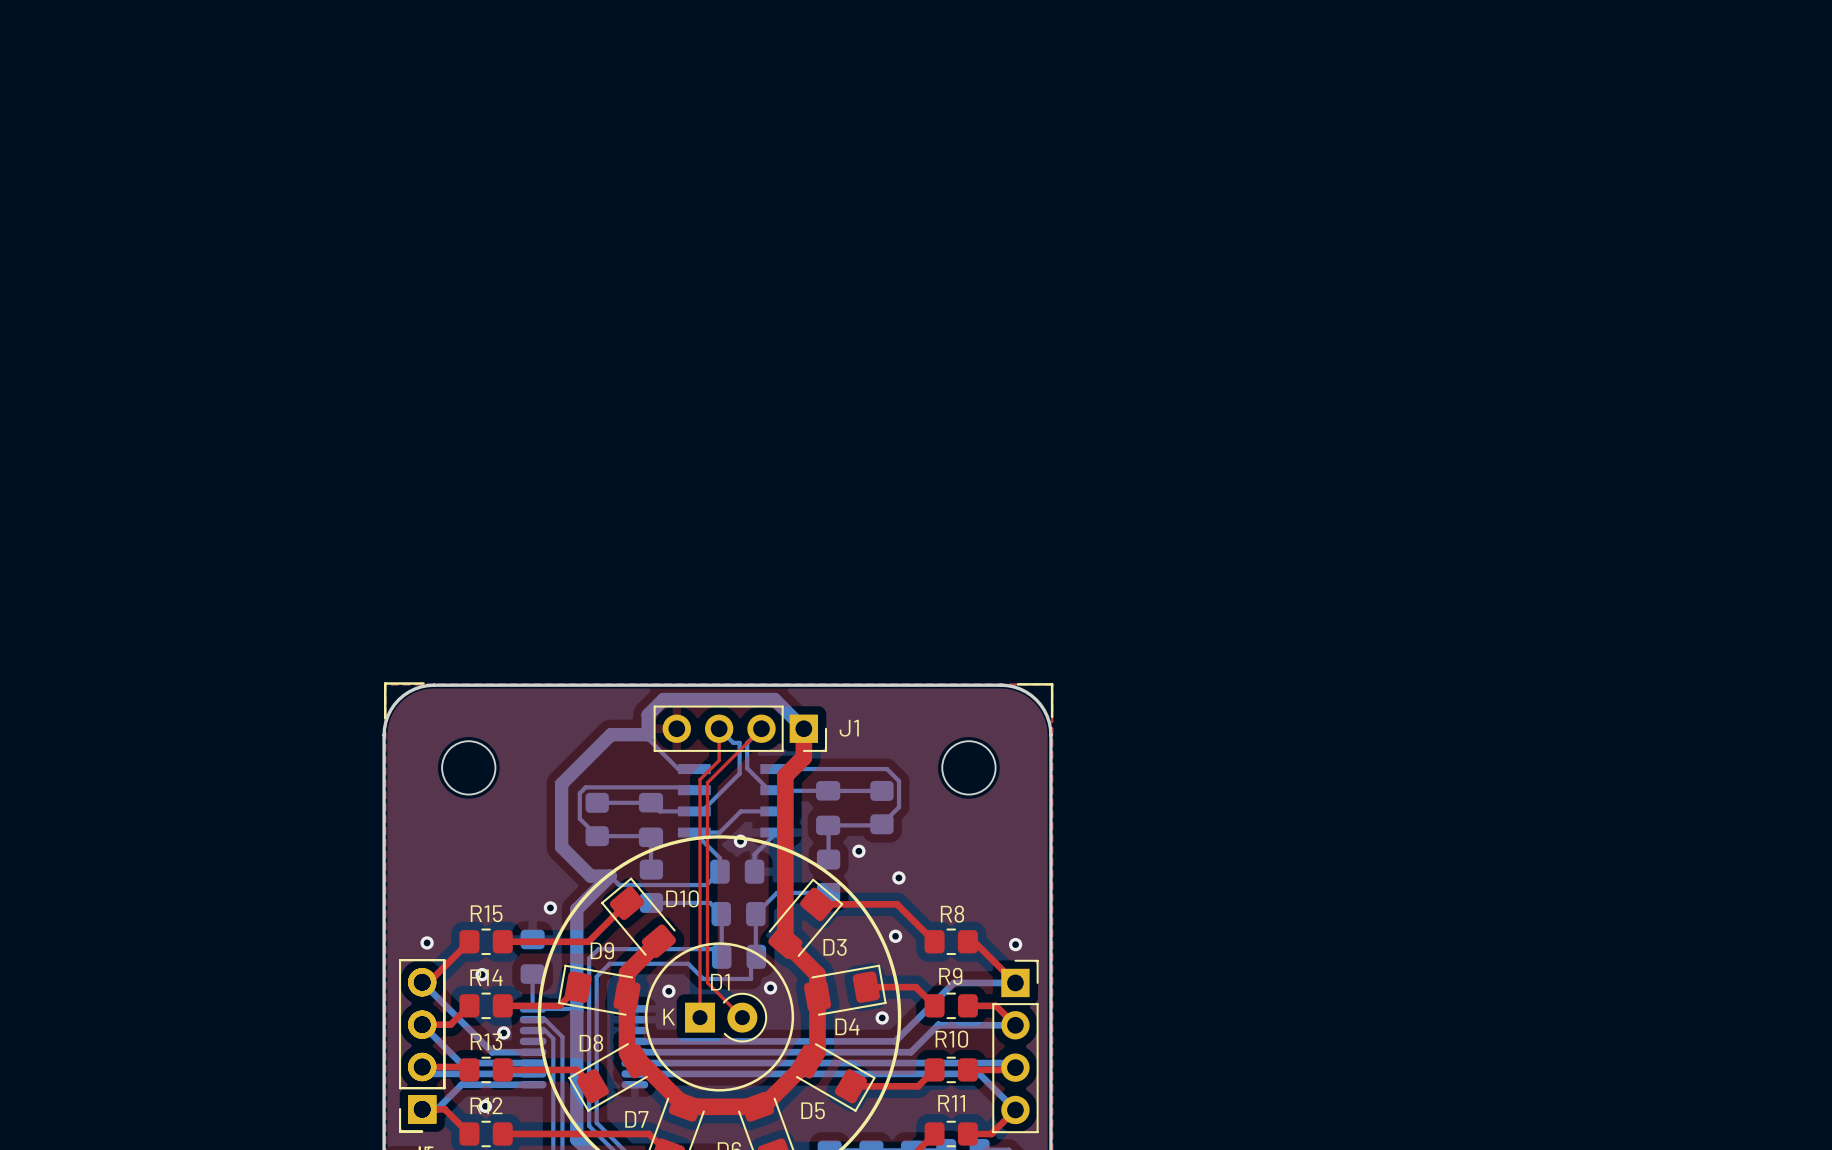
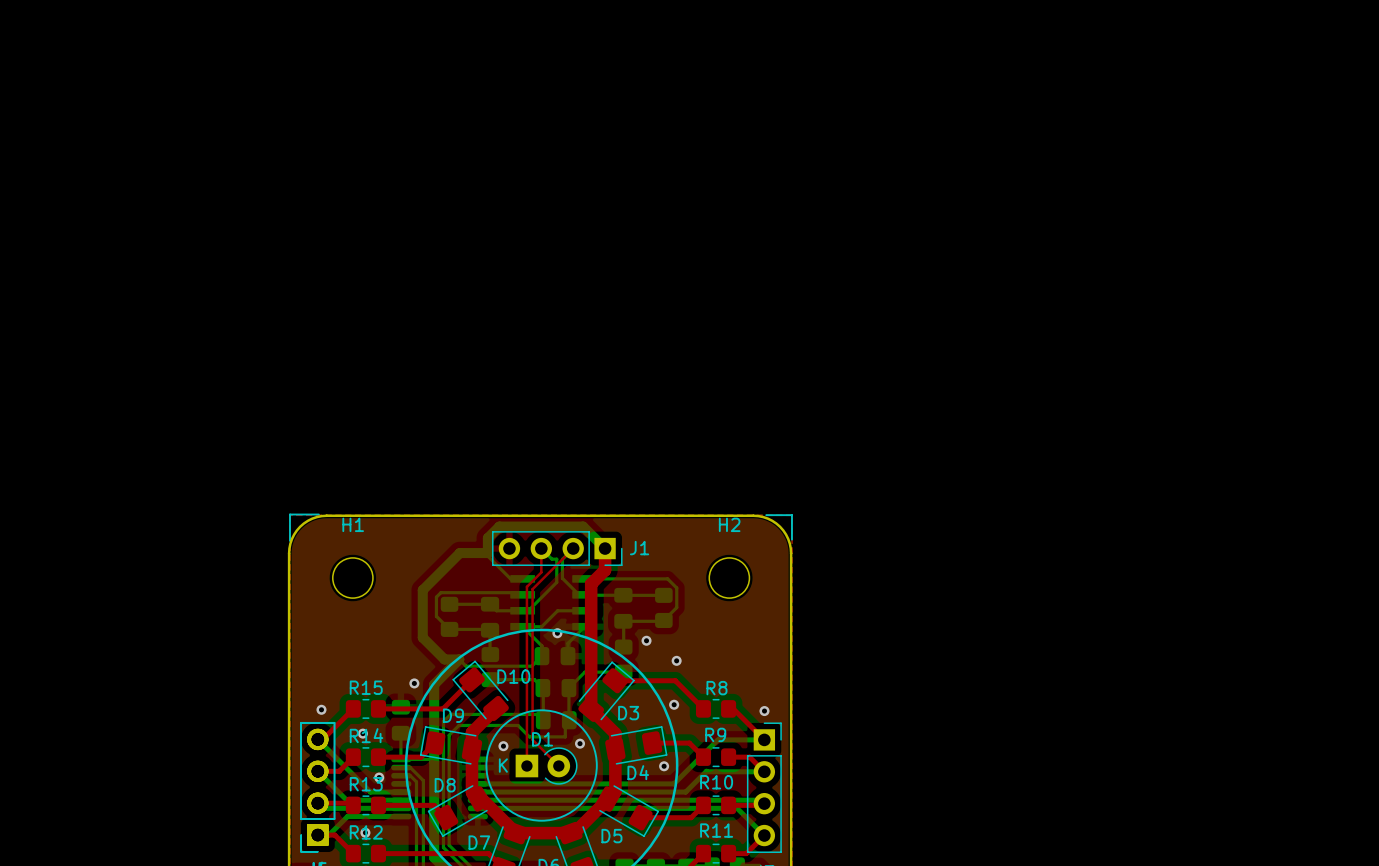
H1 name: none -> H1 (353, 524)
H2 name: none -> H2 (729, 524)

